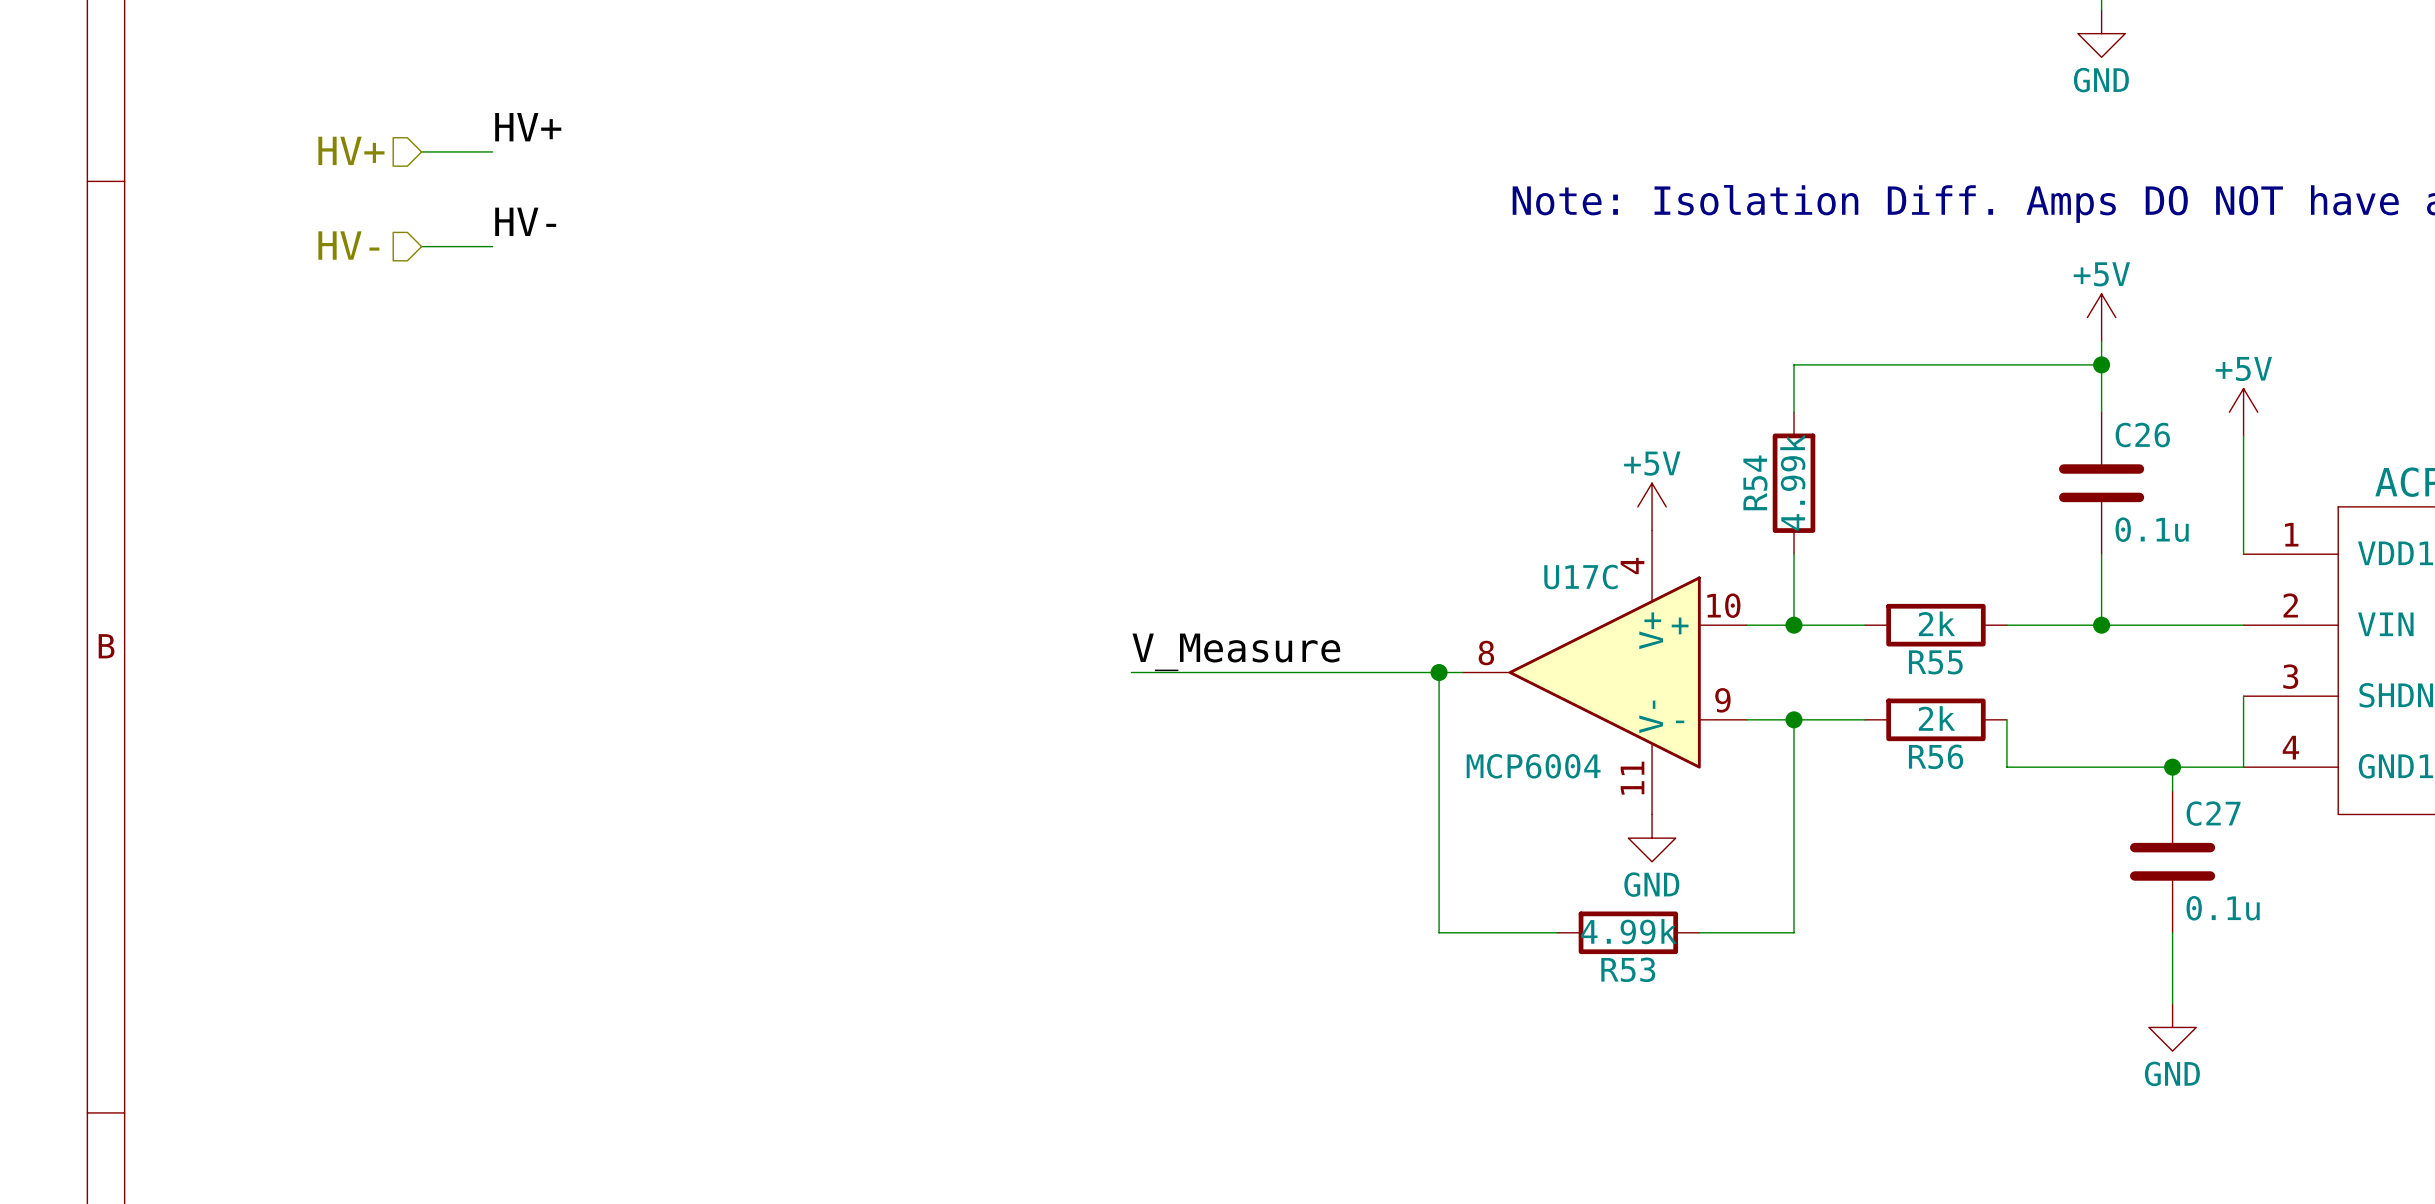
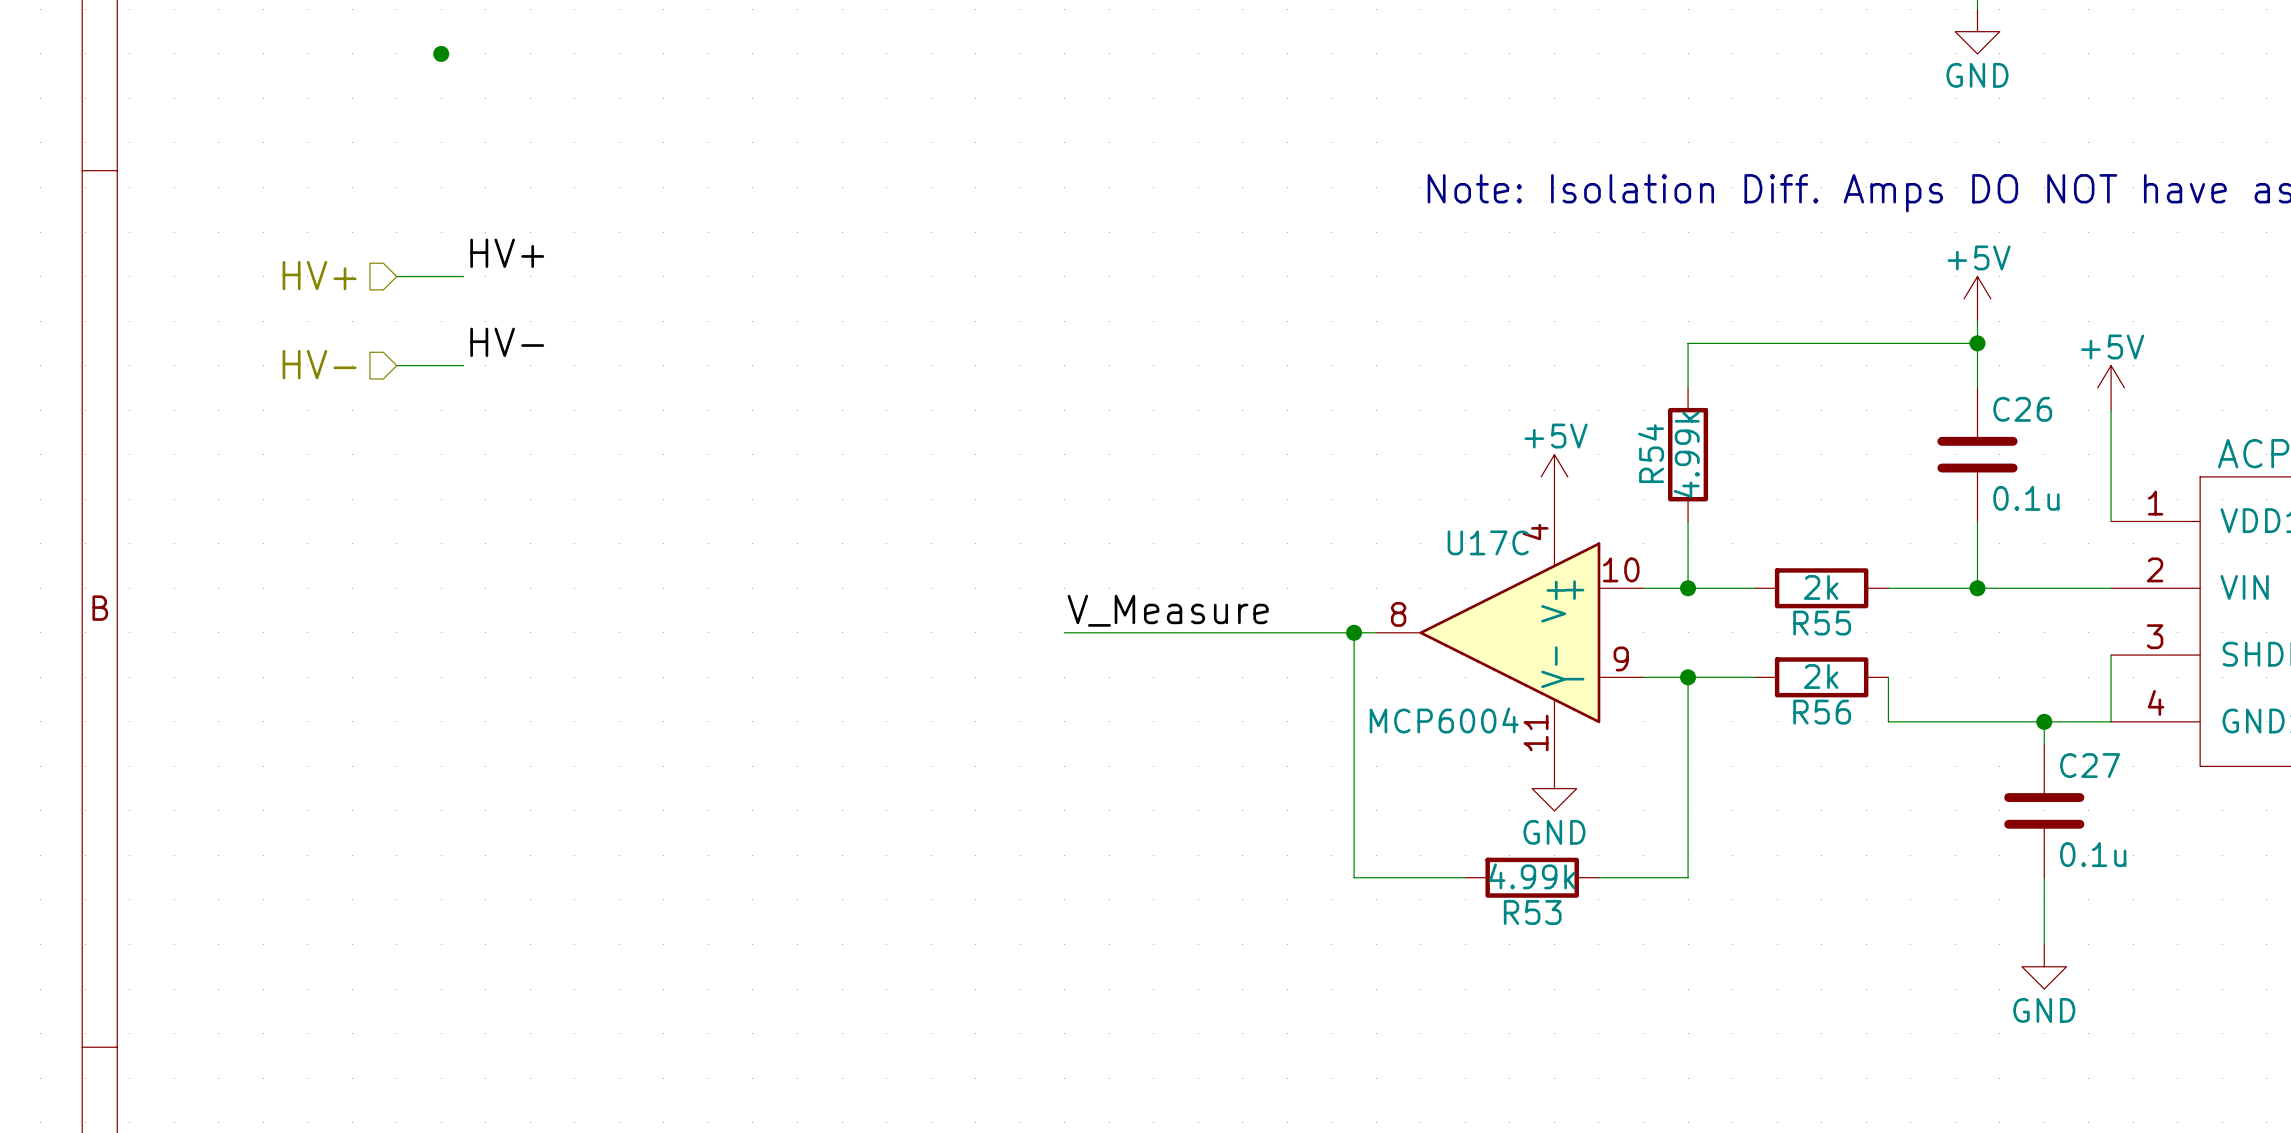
junction: none -> (441, 53)
label position: HV+ (528, 127) -> HV+ (507, 253)
hierarchical label position: HV+ (351, 150) -> HV+ (319, 275)
wire: (421, 151) (492, 151) -> (396, 276) (463, 276)
label position: HV- (525, 221) -> HV- (507, 342)
hierarchical label position: HV- (348, 245) -> HV- (319, 364)
wire: (421, 246) (492, 246) -> (396, 365) (463, 365)

